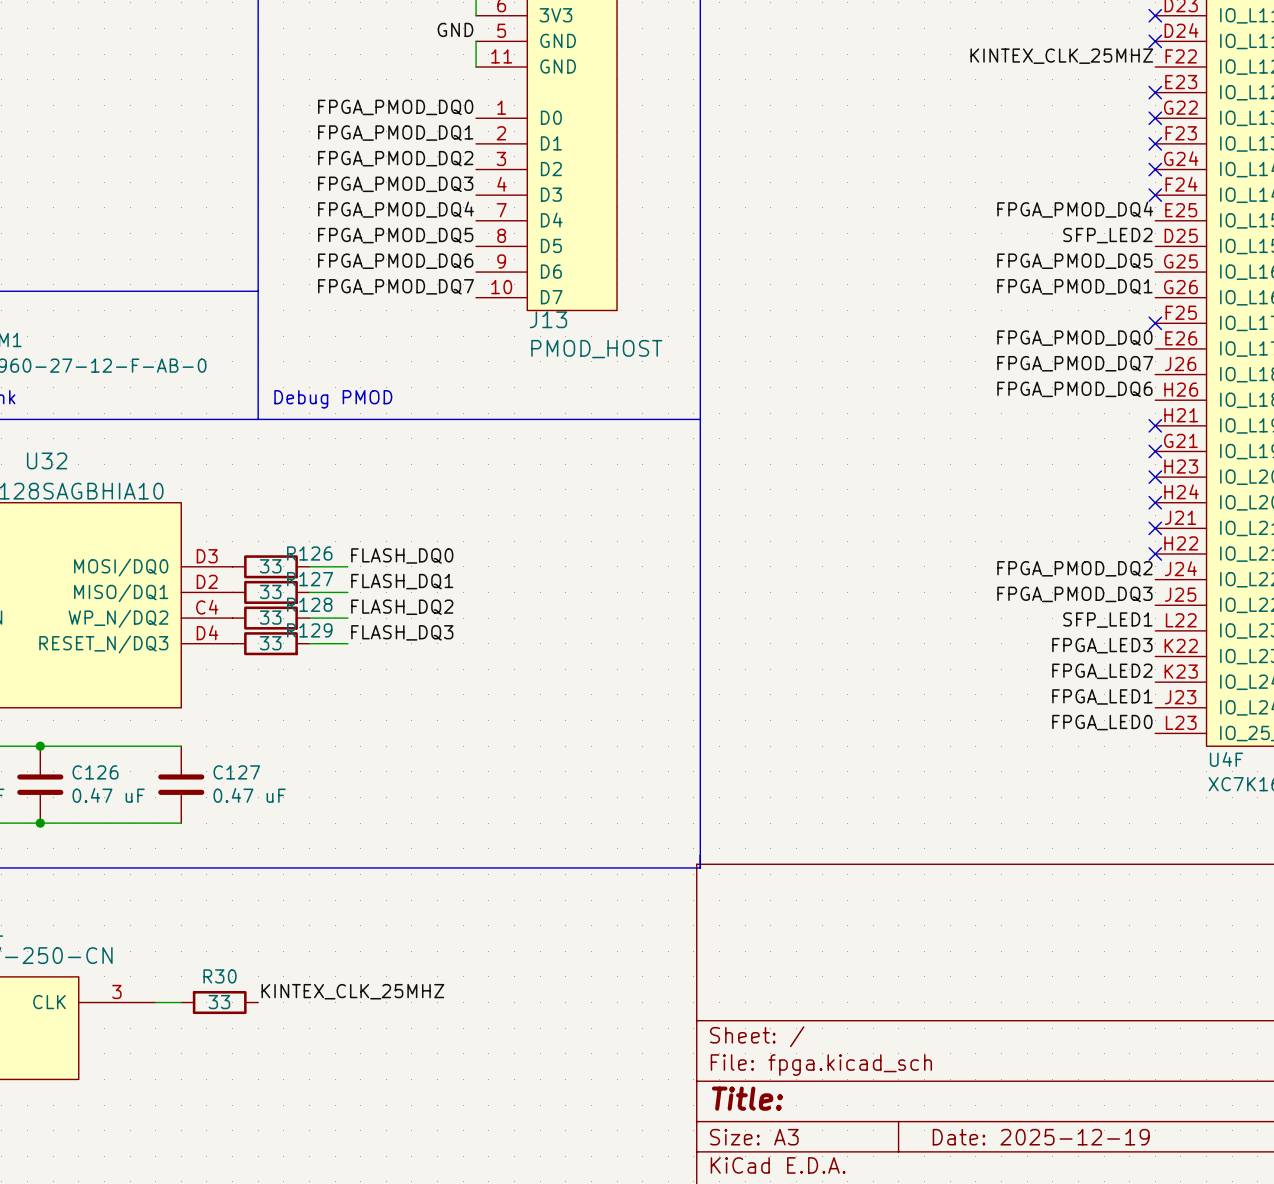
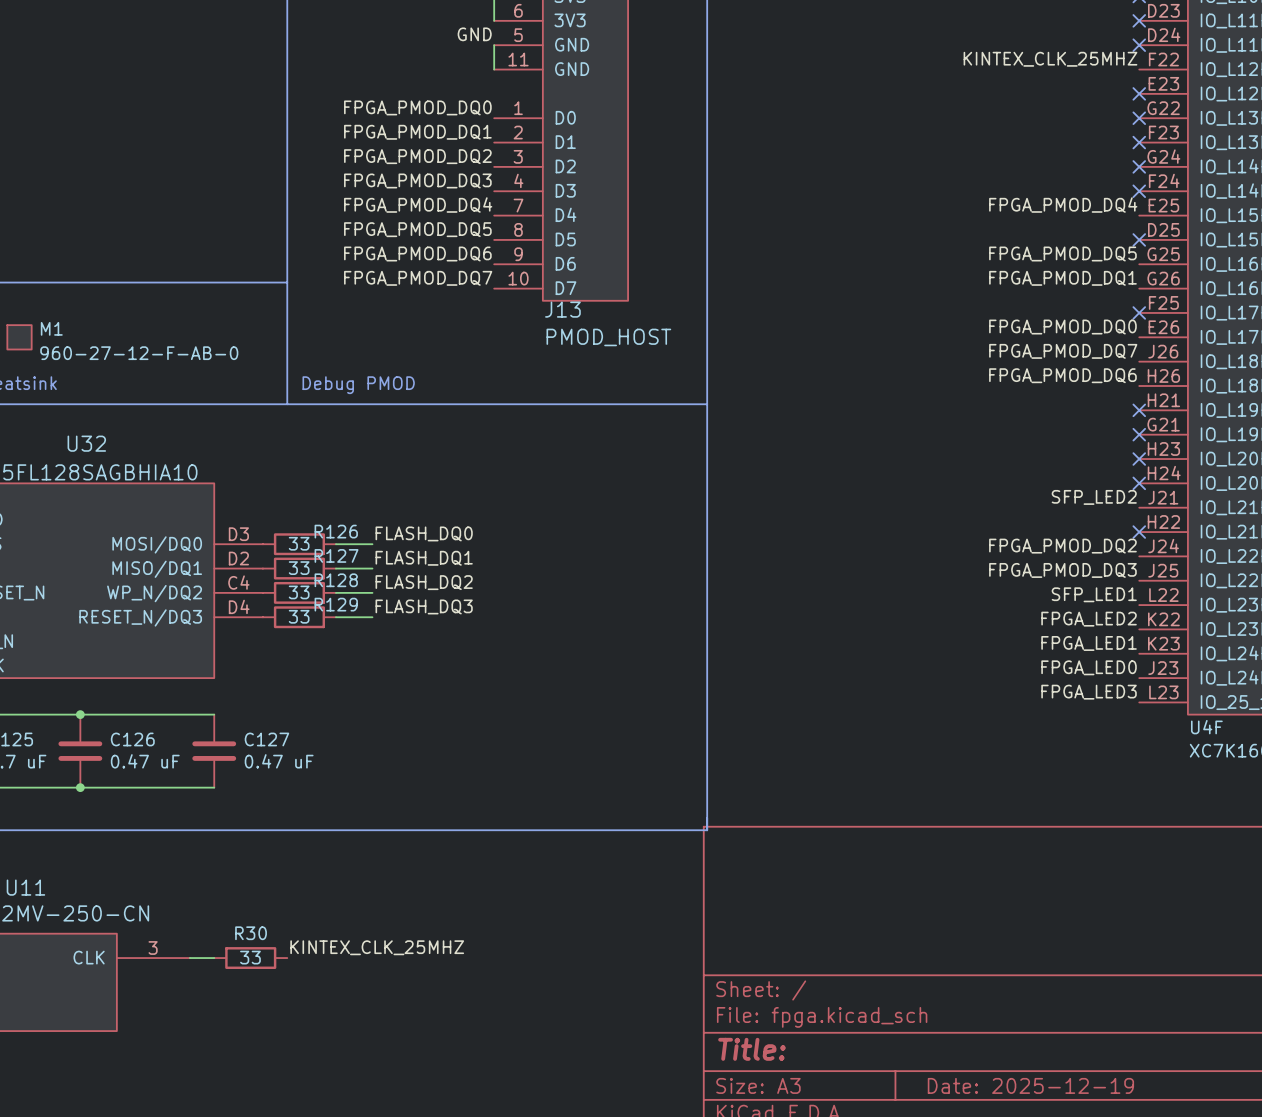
label: SFP_LED2 (1107, 235) -> none
no-connect mark: none -> (1139, 239)
label: none -> SFP_LED2 (1094, 497)
no-connect mark: (1155, 528) -> none
label: FPGA_LED3 (1102, 645) -> FPGA_LED2 (1089, 619)
label: FPGA_LED2 (1102, 671) -> FPGA_LED1 (1089, 643)
label: FPGA_LED1 (1102, 696) -> FPGA_LED0 (1089, 667)
label: FPGA_LED0 (1102, 722) -> FPGA_LED3 (1089, 692)

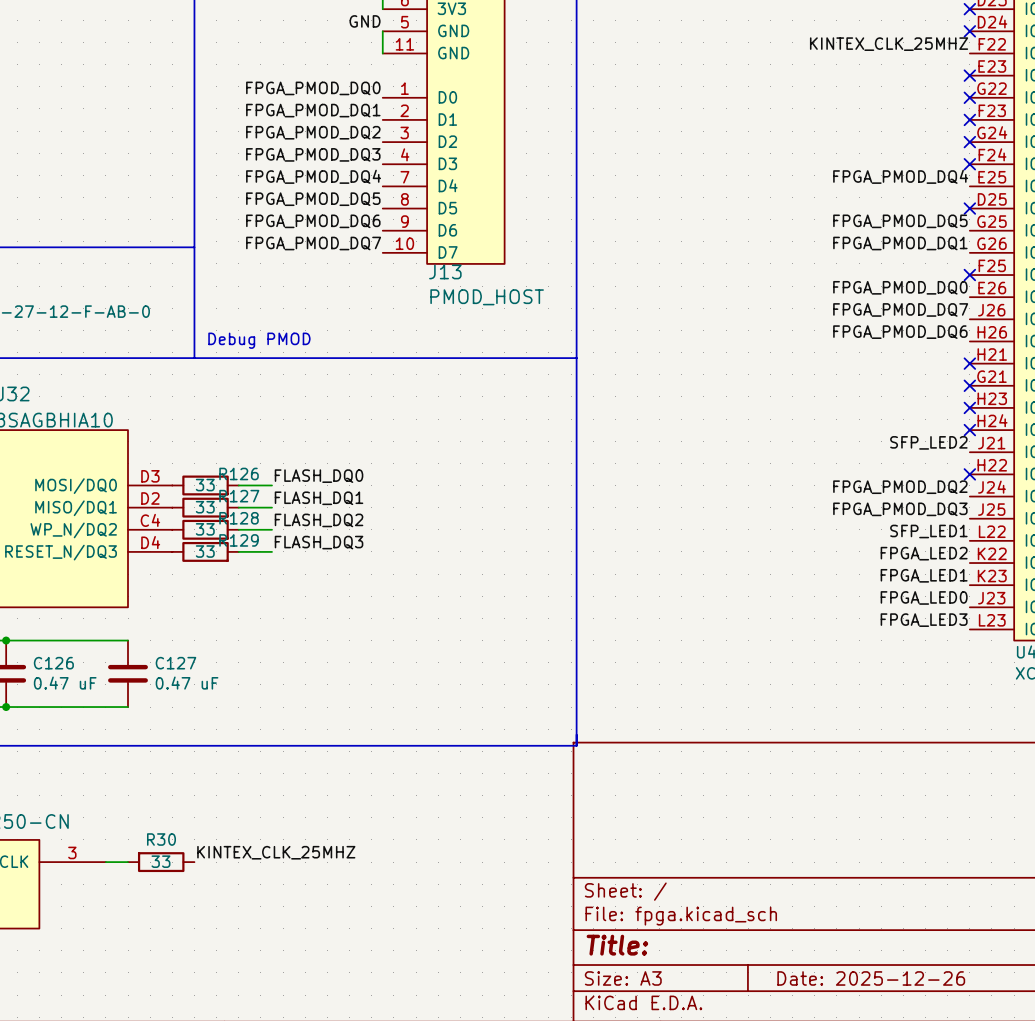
title block: Date: 2025-12-19 (1030, 1085) -> Date: 2025-12-26 (871, 978)

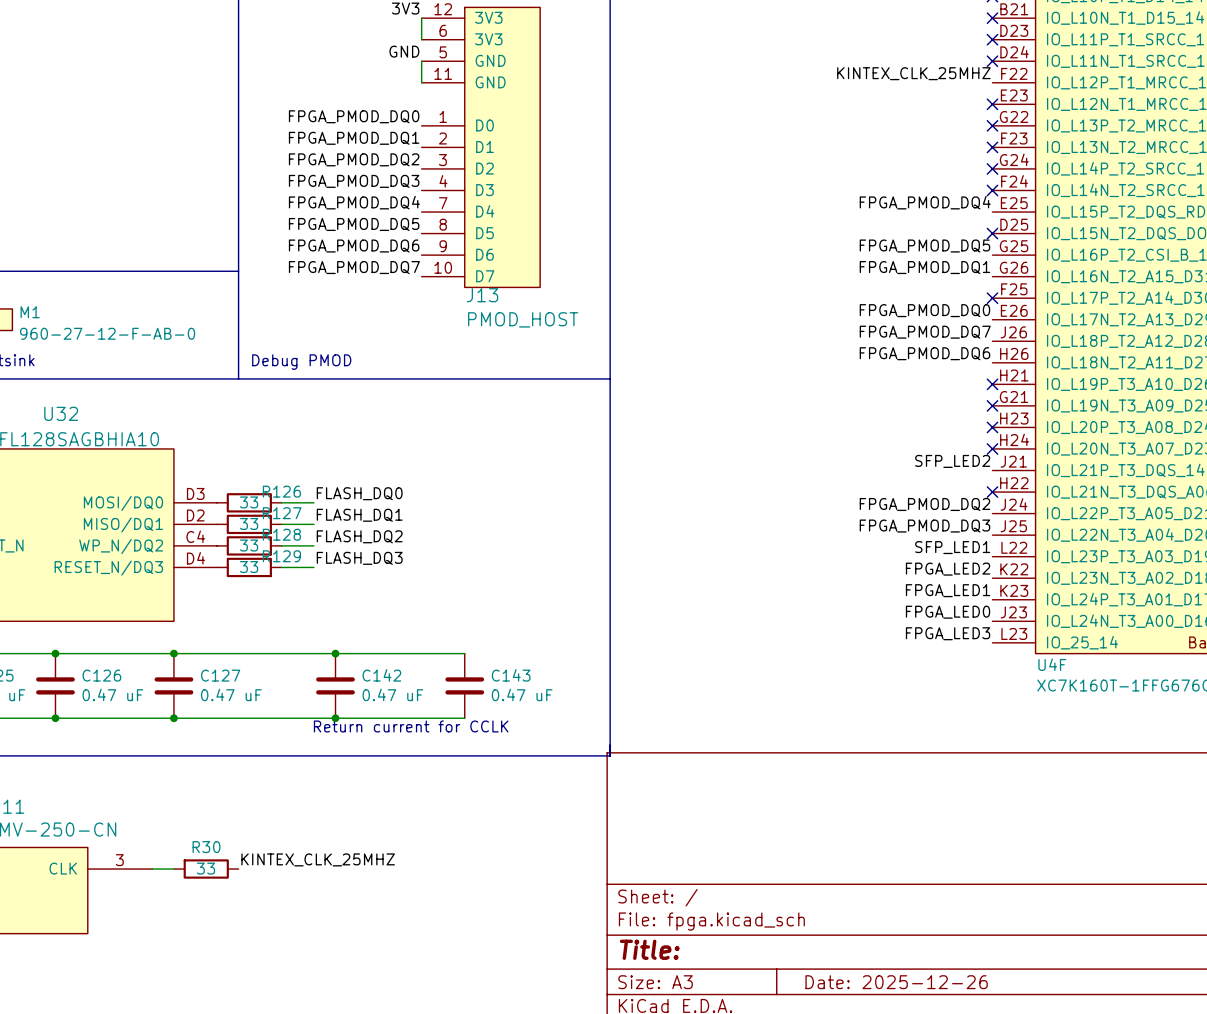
wire: none -> (173, 653) (464, 653)
junction: none -> (173, 653)
junction: none -> (335, 653)
C142: none -> 0.47 uF (335, 685)
C143: none -> 0.47 uF (464, 685)
wire: none -> (173, 718) (464, 718)
junction: none -> (173, 718)
junction: none -> (335, 718)
text: none -> Return current for CCLK (411, 726)

